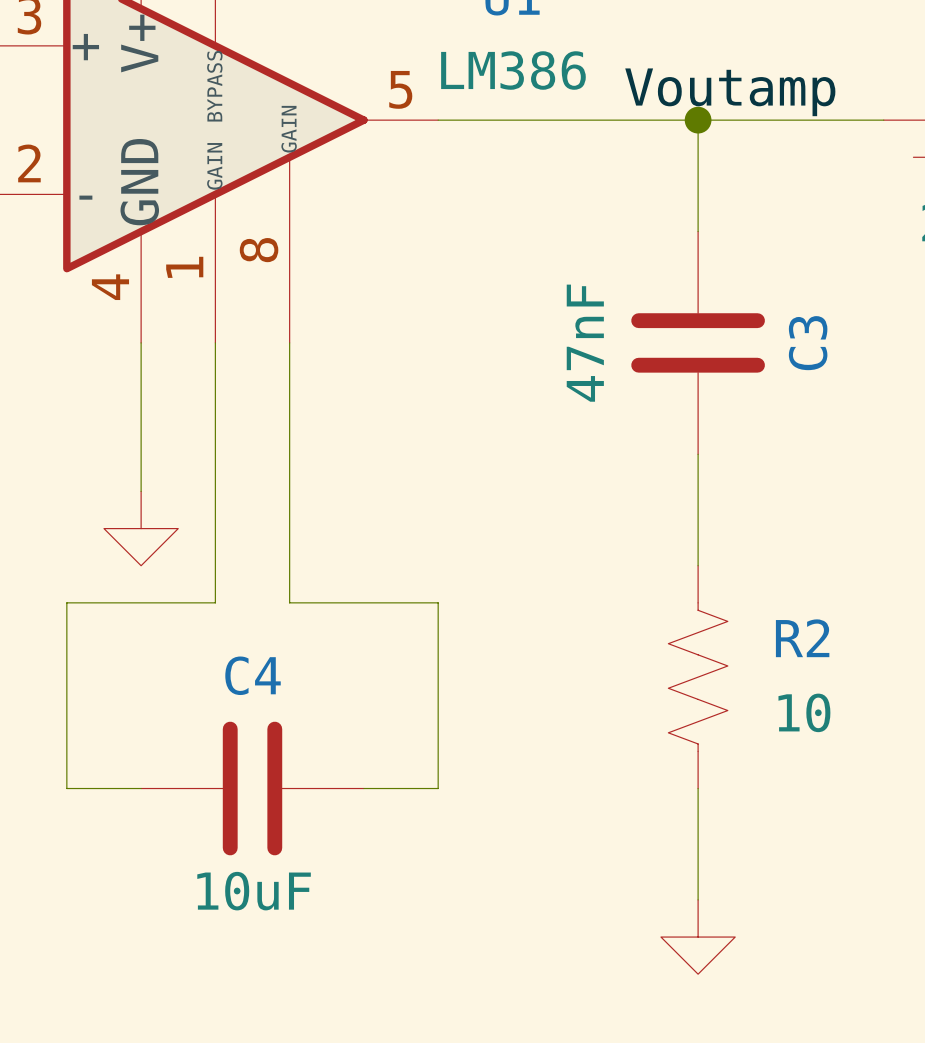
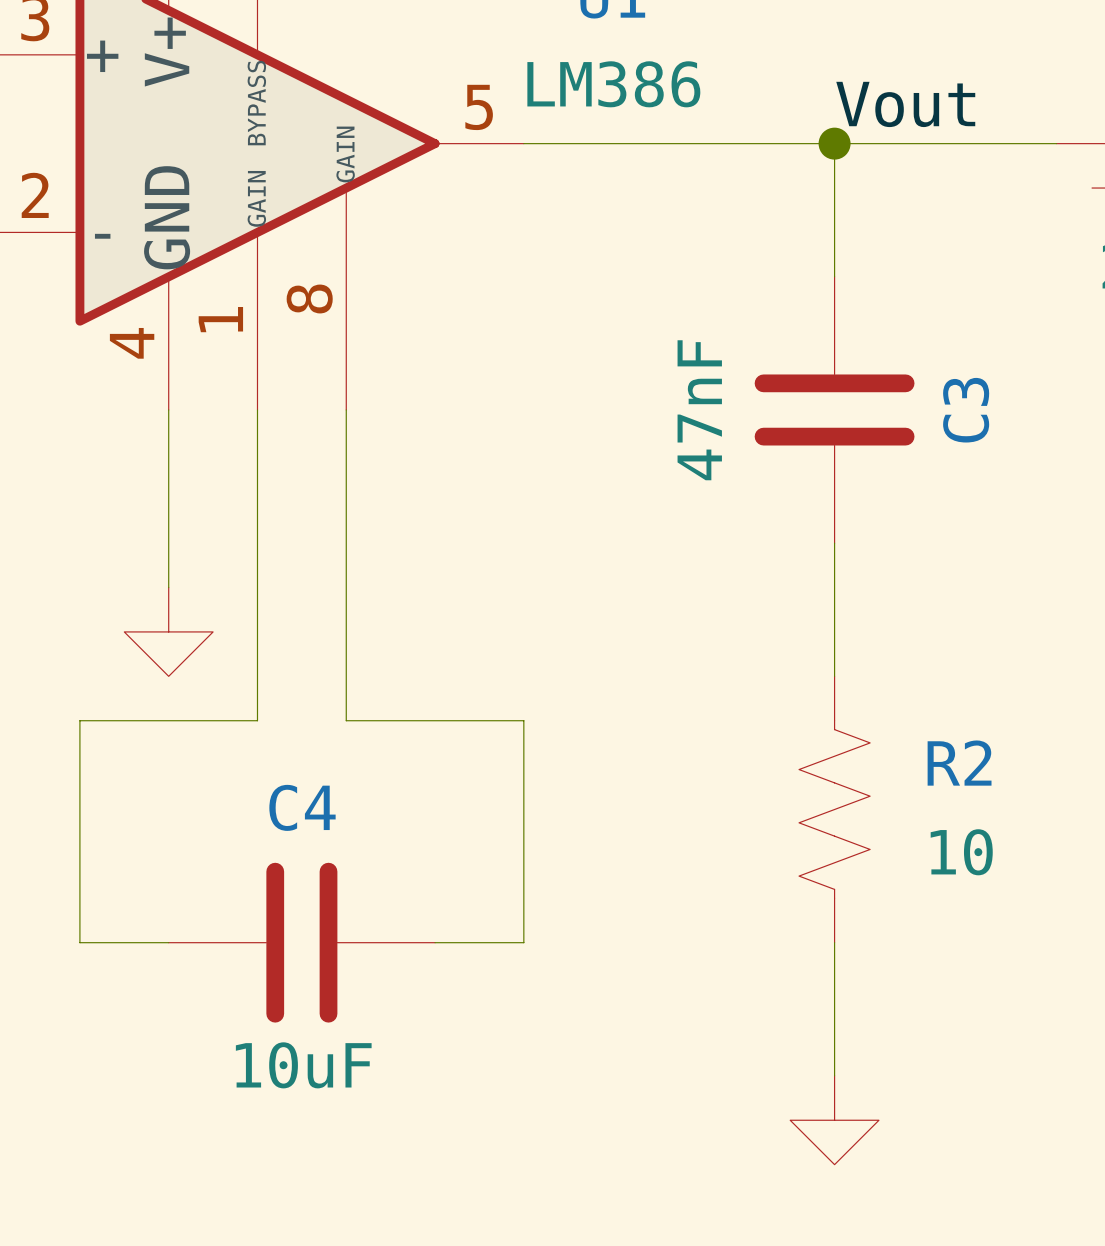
label: Voutamp (730, 92) -> Vout (905, 104)

